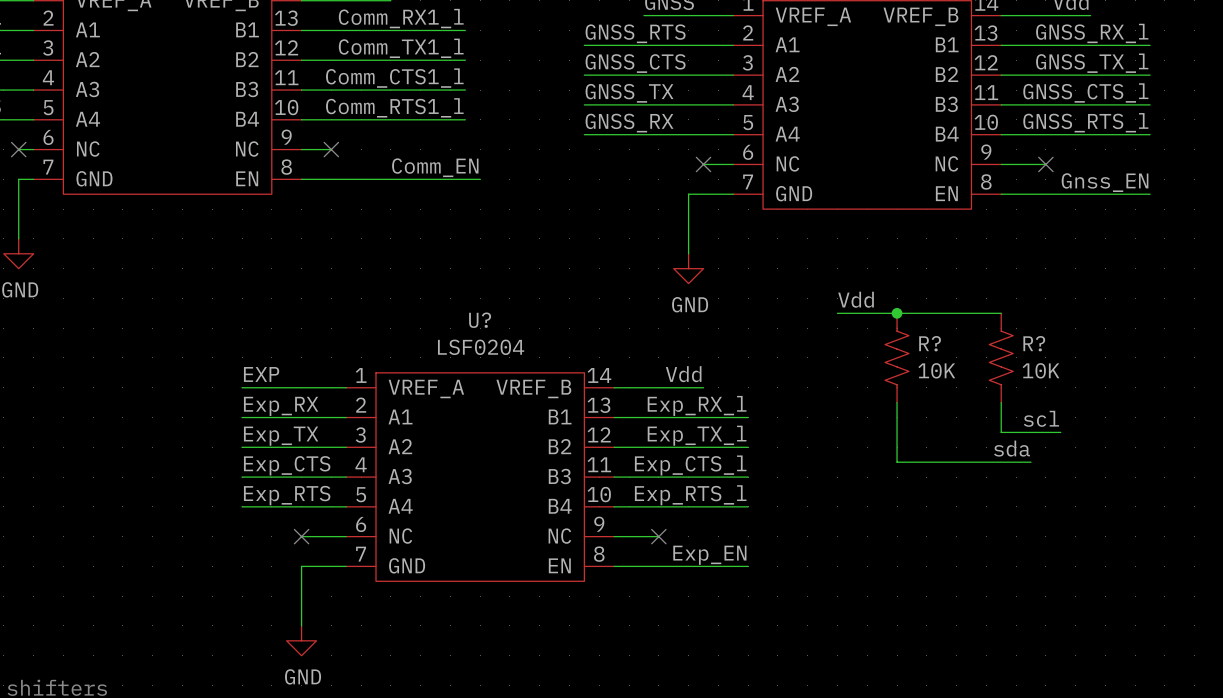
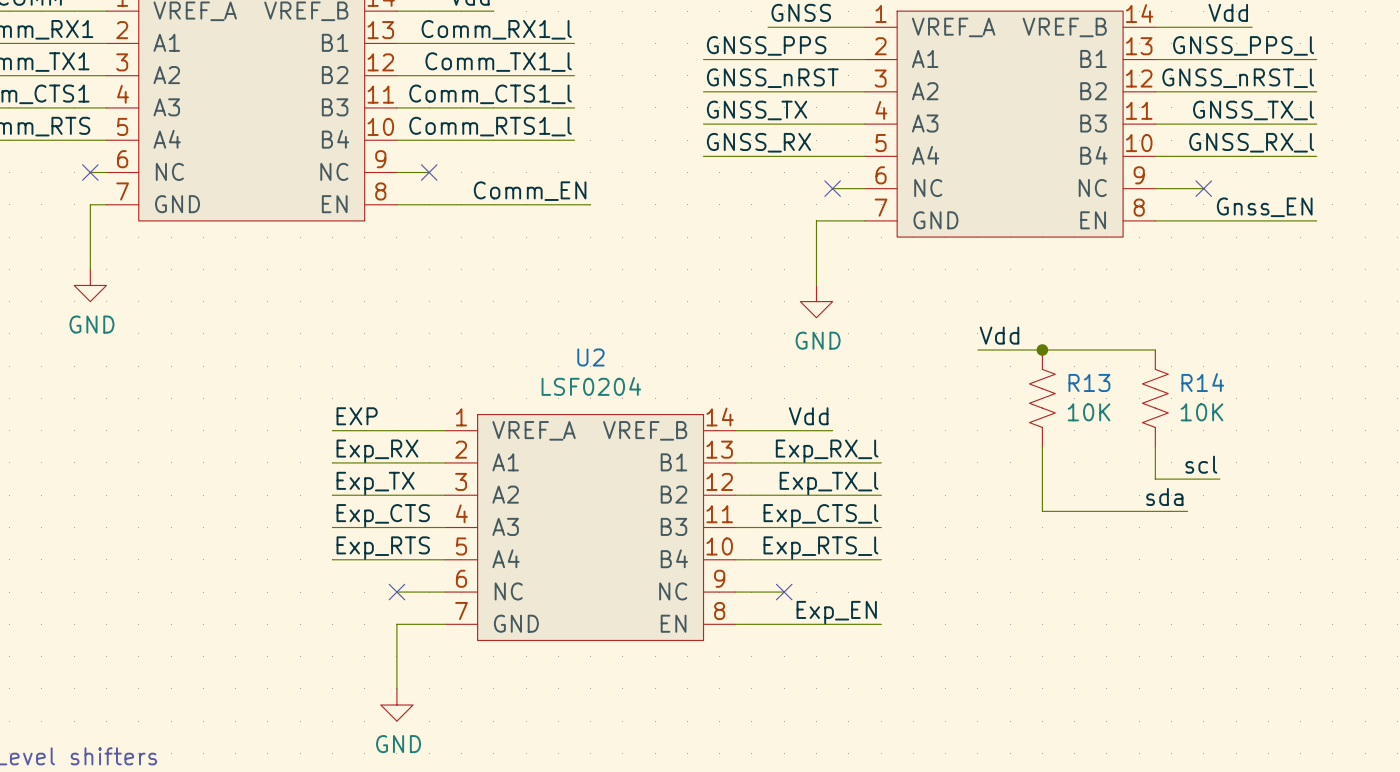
label: GNSS_RTS (635, 33) -> GNSS_PPS (766, 45)
label: GNSS_RX_l (1092, 33) -> GNSS_PPS_l (1243, 45)
label: GNSS_CTS (635, 63) -> GNSS_nRST (772, 78)
label: GNSS_TX_l (1092, 63) -> GNSS_nRST_l (1238, 78)
label: GNSS_CTS_l (1085, 92) -> GNSS_TX_l (1253, 110)
label: GNSS_RTS_l (1085, 122) -> GNSS_RX_l (1251, 142)
U? name: U? (480, 320) -> U2 (590, 357)
R? name: R? (930, 343) -> R13 (1089, 382)
R? name: R? (1034, 343) -> R14 (1202, 382)

